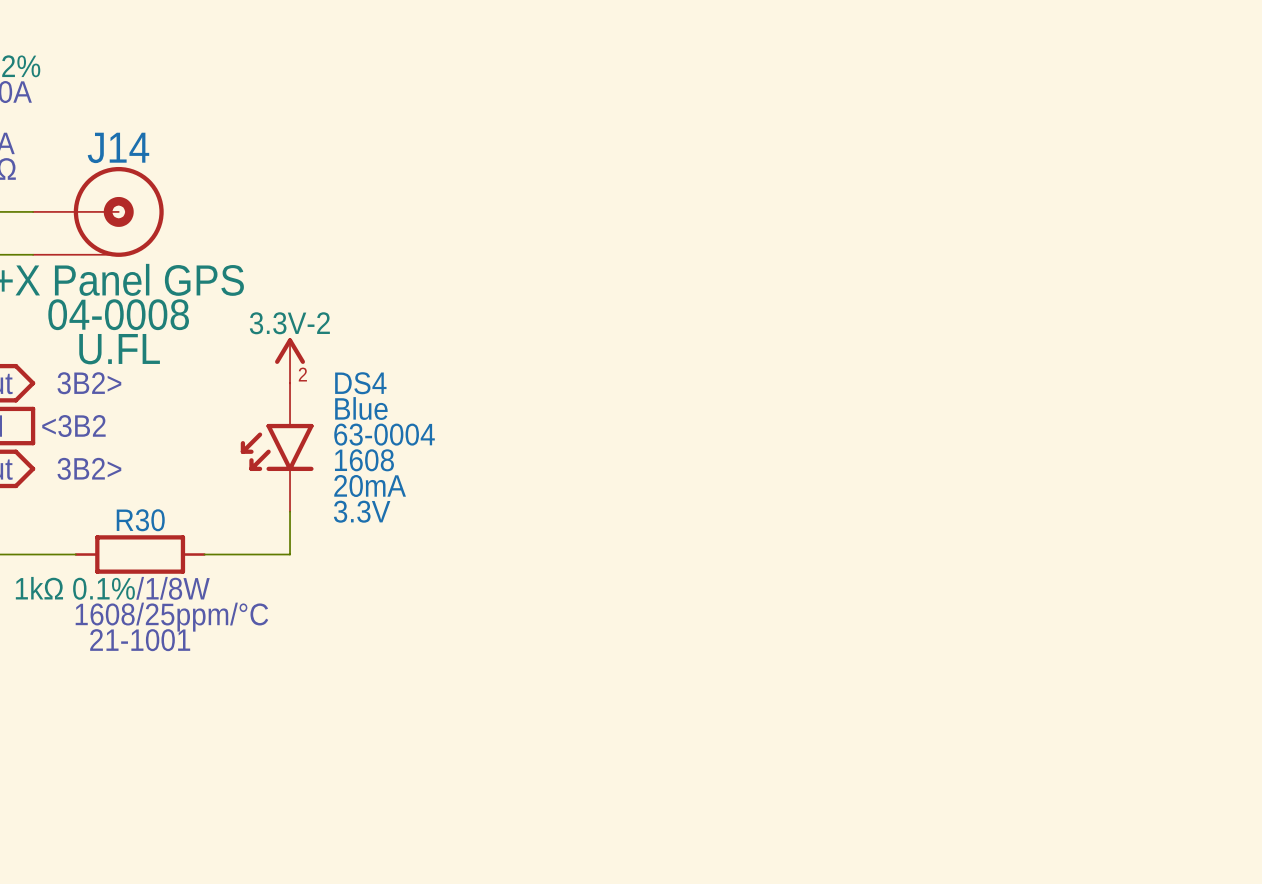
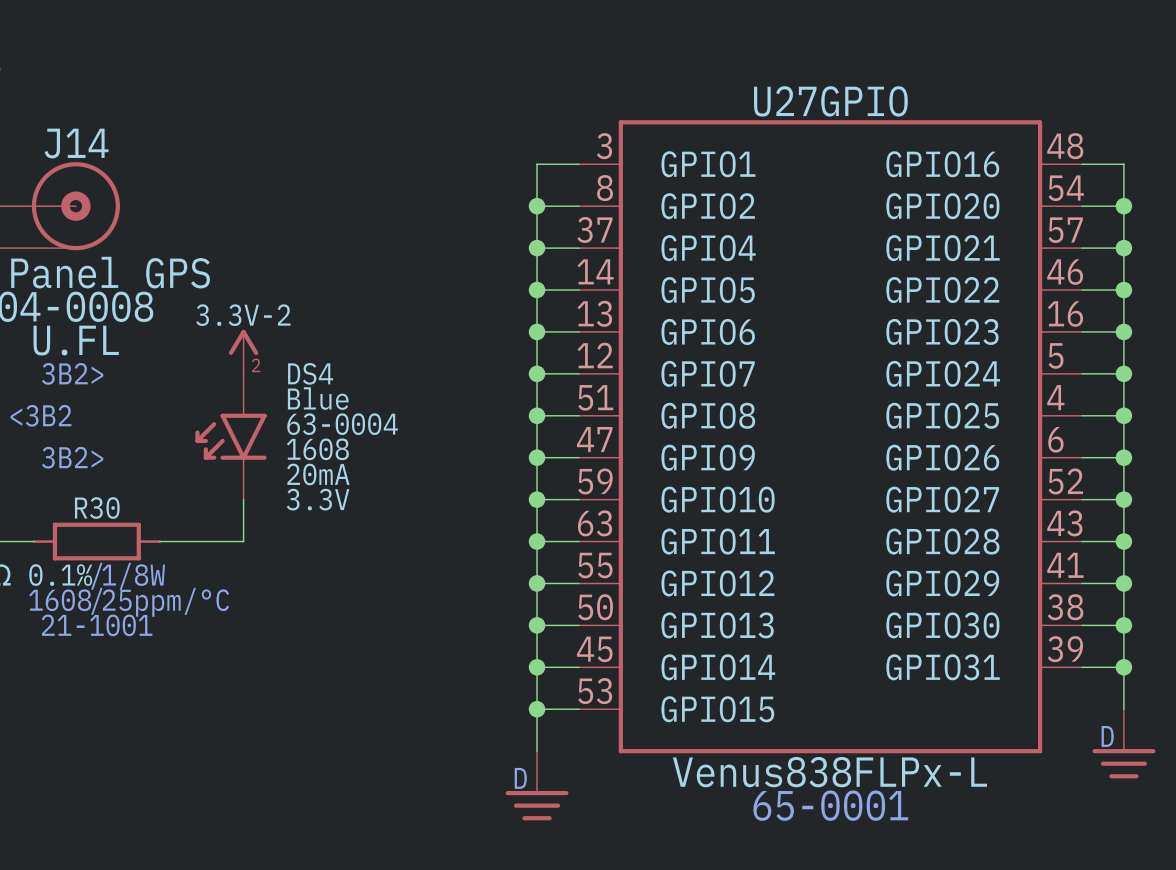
wire: none -> (578, 164) (537, 164) (537, 751)
wire: none -> (1081, 164) (1123, 164) (1123, 709)
wire: none -> (537, 206) (578, 206)
junction: none -> (537, 206)
wire: none -> (1081, 206) (1123, 206)
junction: none -> (1123, 206)
wire: none -> (537, 248) (578, 248)
junction: none -> (537, 248)
wire: none -> (1081, 248) (1123, 248)
junction: none -> (1123, 248)
wire: none -> (537, 290) (578, 290)
junction: none -> (537, 290)
wire: none -> (1081, 290) (1123, 290)
junction: none -> (1123, 290)
wire: none -> (537, 331) (578, 331)
junction: none -> (537, 331)
wire: none -> (1081, 331) (1123, 331)
junction: none -> (1123, 331)
wire: none -> (537, 373) (578, 373)
junction: none -> (537, 373)
wire: none -> (1081, 373) (1123, 373)
junction: none -> (1123, 373)
wire: none -> (537, 415) (578, 415)
junction: none -> (537, 415)
wire: none -> (1081, 415) (1123, 415)
junction: none -> (1123, 415)
U27GPIO: none -> Venus838FLPx-L (830, 436)
wire: none -> (537, 457) (578, 457)
junction: none -> (537, 457)
wire: none -> (1081, 457) (1123, 457)
junction: none -> (1123, 457)
wire: none -> (537, 499) (578, 499)
junction: none -> (537, 499)
wire: none -> (1081, 499) (1123, 499)
junction: none -> (1123, 499)
wire: none -> (537, 541) (578, 541)
junction: none -> (537, 541)
wire: none -> (1081, 541) (1123, 541)
junction: none -> (1123, 541)
wire: none -> (537, 583) (578, 583)
junction: none -> (537, 583)
wire: none -> (1081, 583) (1123, 583)
junction: none -> (1123, 583)
wire: none -> (537, 625) (578, 625)
junction: none -> (537, 625)
wire: none -> (1081, 625) (1123, 625)
junction: none -> (1123, 625)
wire: none -> (537, 667) (578, 667)
junction: none -> (537, 667)
wire: none -> (1081, 667) (1123, 667)
junction: none -> (1123, 667)
wire: none -> (537, 709) (578, 709)
junction: none -> (537, 709)
power symbol: none -> (1123, 743)
power symbol: none -> (537, 785)

